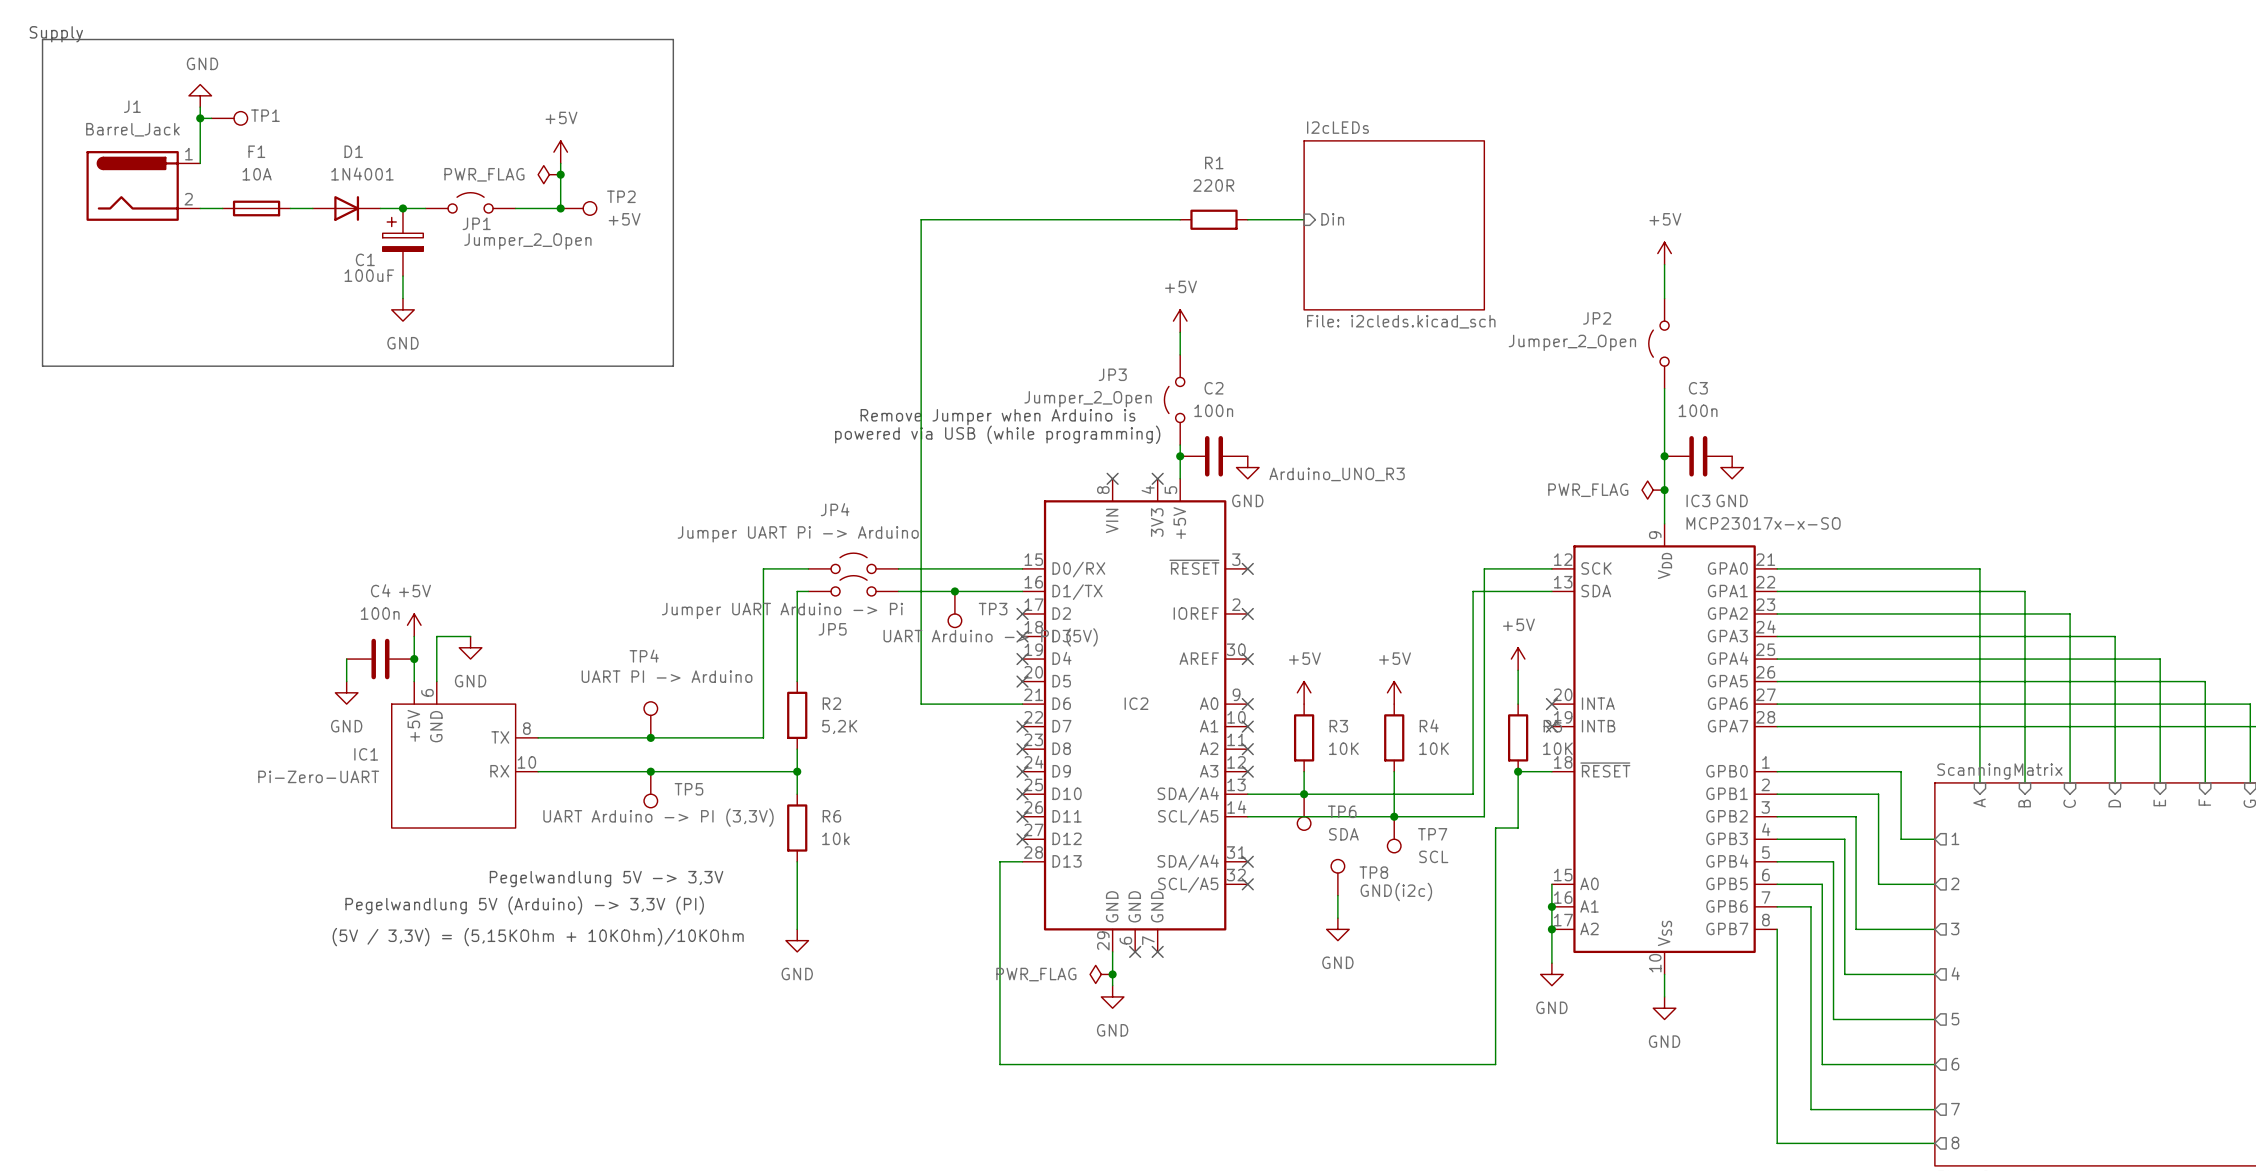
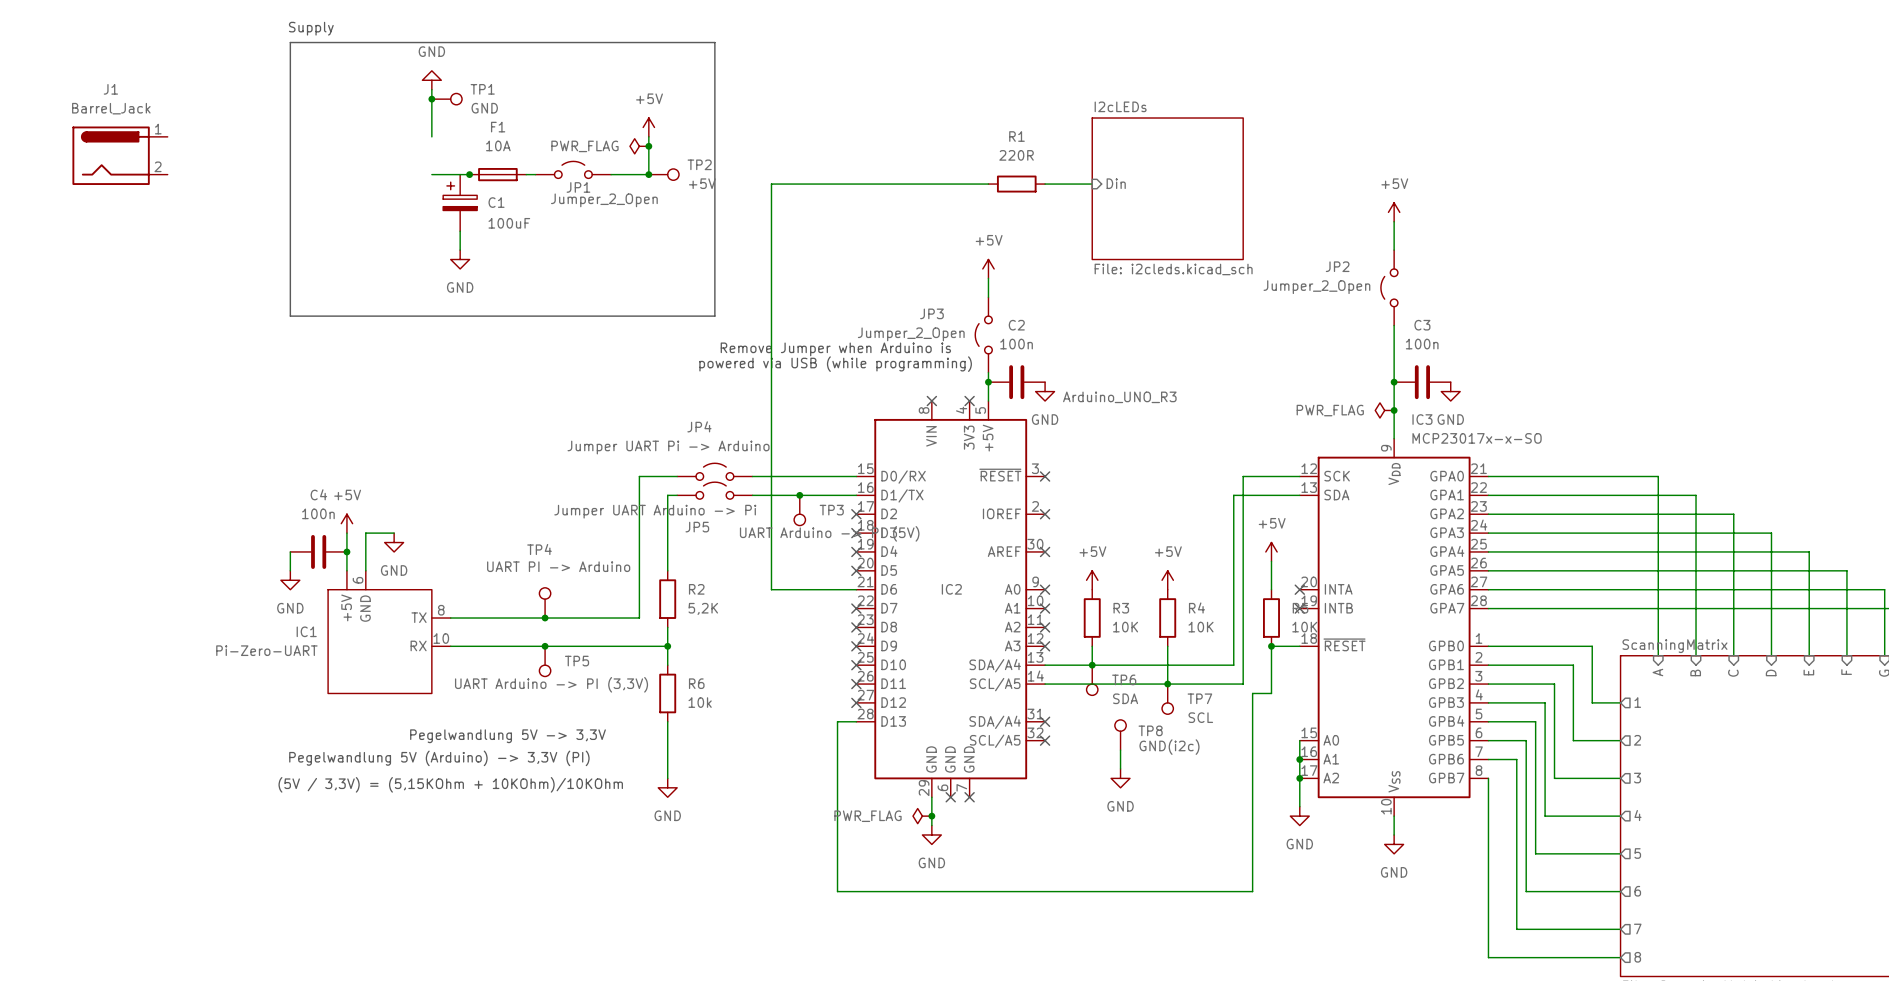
text: Supply (56, 34) -> none
text: none -> Supply (311, 28)
line: (42, 39) (673, 39) (673, 366) (42, 366) (42, 39) -> none
line: none -> (290, 42) (714, 42) (714, 316) (290, 316) (290, 42)
power symbol: GND (200, 95) -> none
power symbol: none -> GND (431, 80)
wire: (200, 107) (200, 163) -> none
wire: none -> (431, 89) (431, 136)
TP1 name position: TP1 (265, 115) -> TP1 (482, 89)
wire: (200, 118) (211, 118) -> none
junction: (200, 118) -> none
TP1 position: (229, 118) -> (446, 99)
junction: none -> (431, 99)
TP1 value: none -> GND (484, 108)
power symbol position: +5V (560, 152) -> +5V (648, 127)
wire: (560, 163) (560, 208) -> none
wire: none -> (648, 136) (648, 174) (611, 174)
power symbol position: PWR_FLAG (549, 174) -> PWR_FLAG (639, 146)
junction: (560, 174) -> none
junction: none -> (648, 146)
JP1 position: (470, 202) -> (573, 169)
wire: (200, 208) (222, 208) -> none
F1 position: (256, 208) -> (497, 174)
wire: (290, 208) (312, 208) -> none
D1: 1N4001 (346, 208) -> none
wire: (380, 208) (425, 208) -> none
junction: (402, 208) -> none
TP2 position: (578, 208) -> (663, 174)
wire: none -> (526, 174) (535, 174)
junction: none -> (648, 174)
JP1 value position: Jumper_2_Open (527, 241) -> Jumper_2_Open (604, 200)
C1 position: (402, 242) -> (460, 202)
C1 name position: C1 (365, 259) -> C1 (496, 202)
C1 value position: 100uF (369, 275) -> 100uF (509, 223)
wire: (402, 276) (402, 298) -> (460, 231) (460, 250)
power symbol: GND (402, 309) -> none
power symbol: none -> GND (460, 259)

